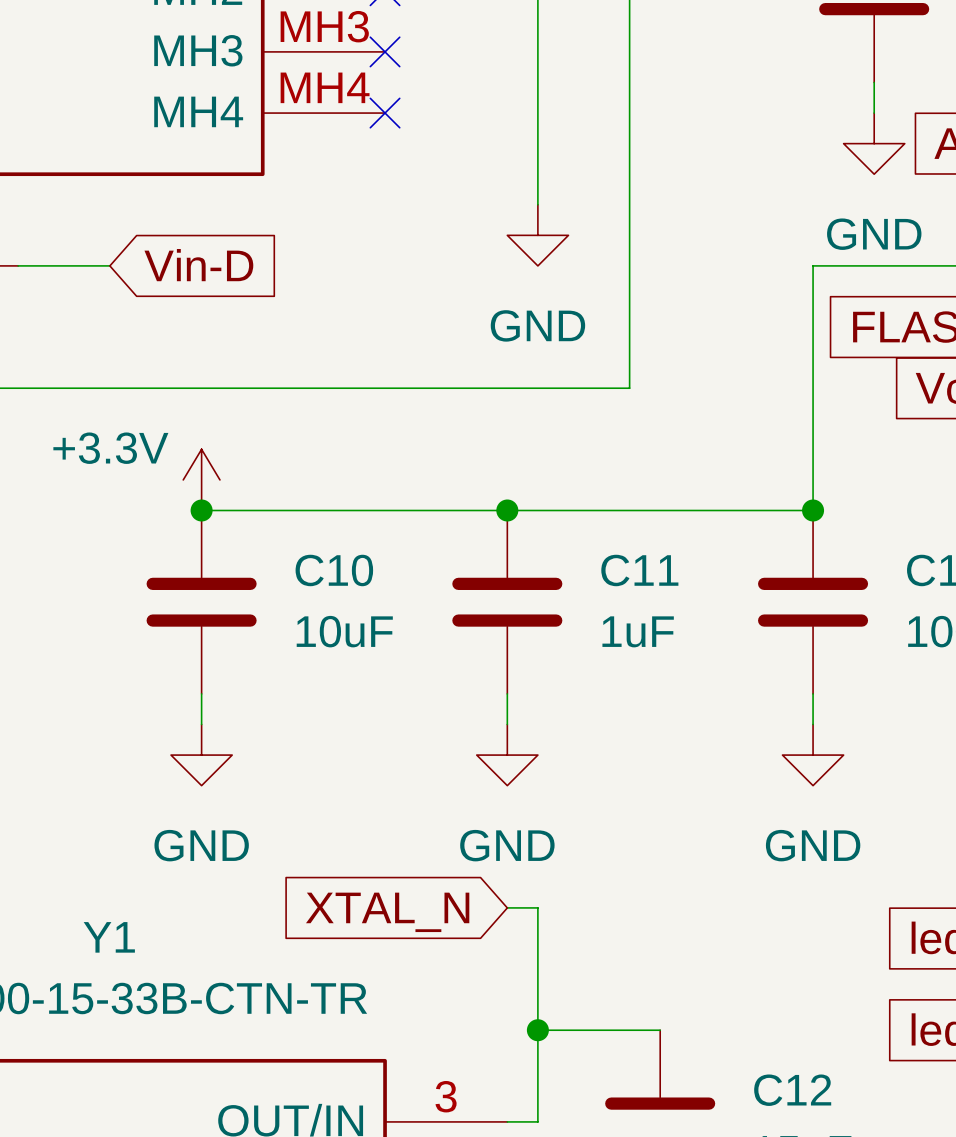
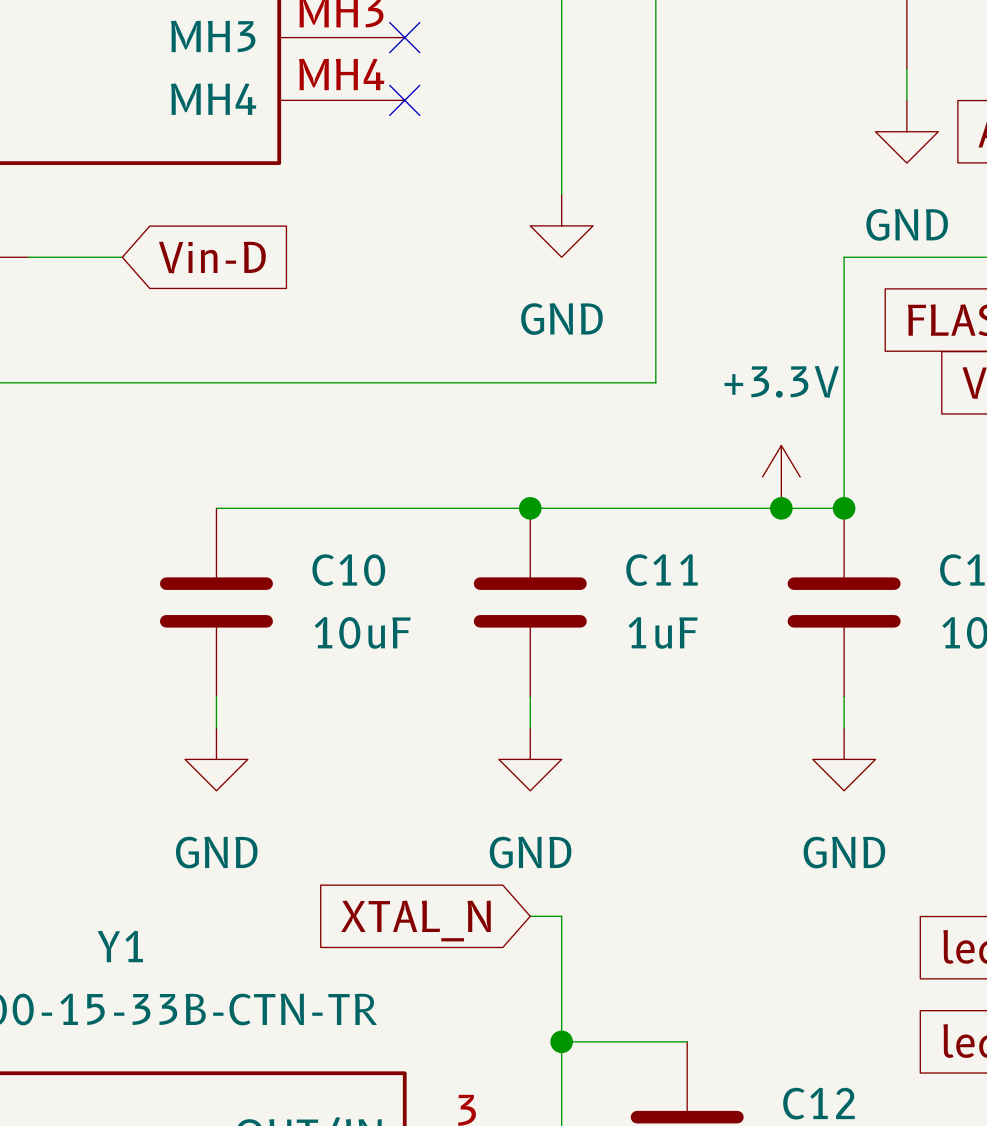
power symbol text position: +3.3V (110, 448) -> +3.3V (781, 381)
power symbol position: +3.3V (201, 479) -> +3.3V (781, 476)
junction: (201, 510) -> none
junction: none -> (781, 508)

